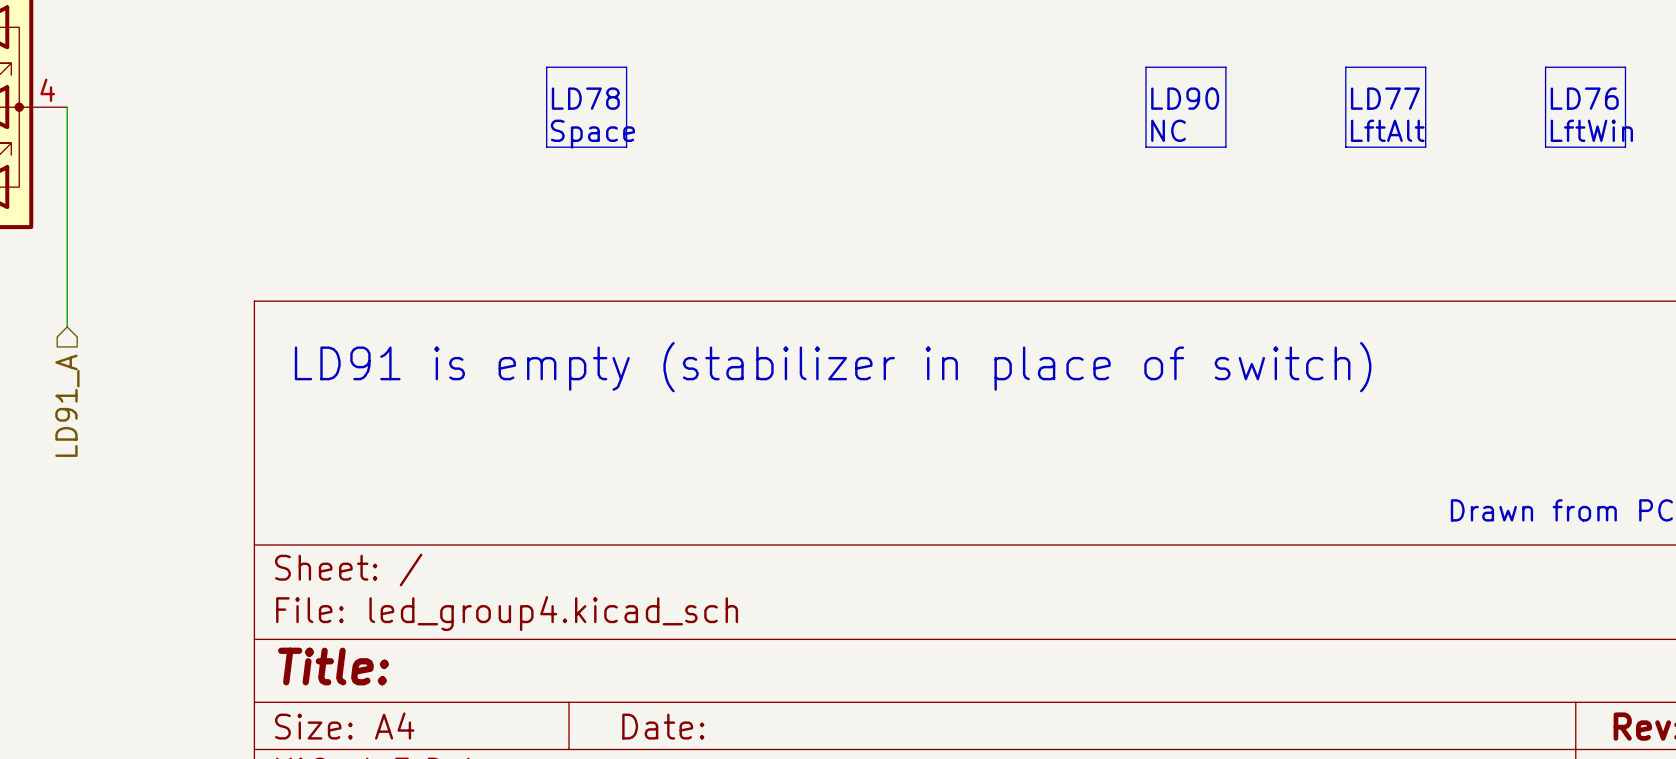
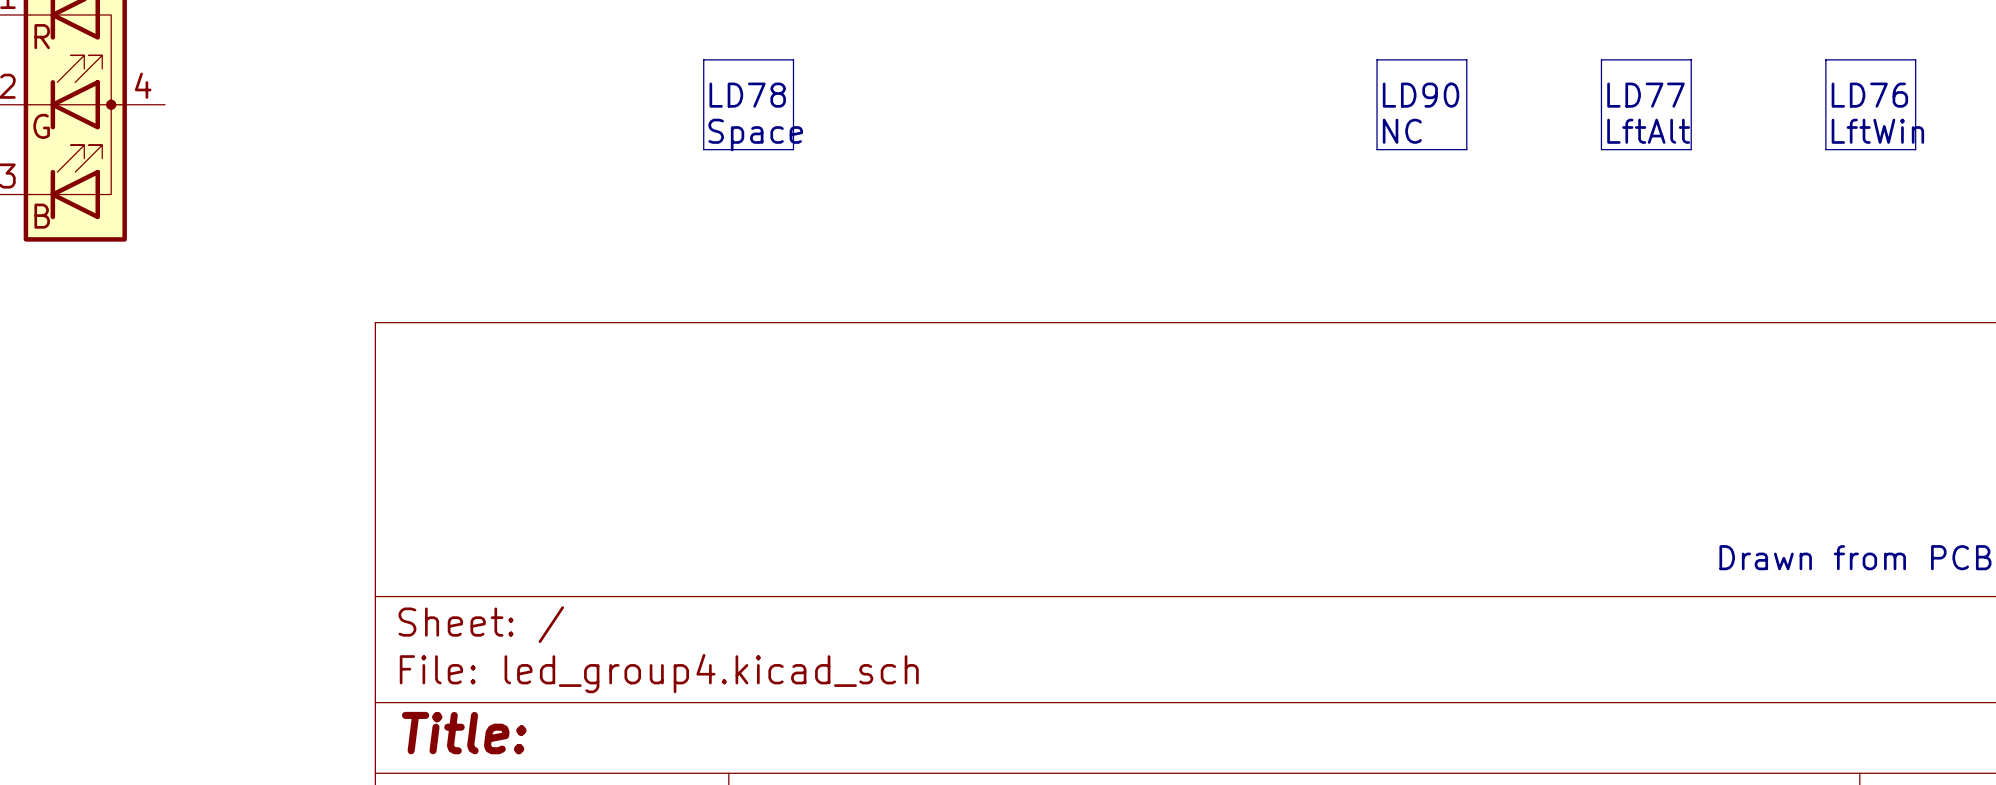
wire: (67, 107) (67, 326) -> none
text: LD91 is empty (stabilizer in place of switch) (833, 367) -> none
hierarchical label: LD91_A (67, 405) -> none

